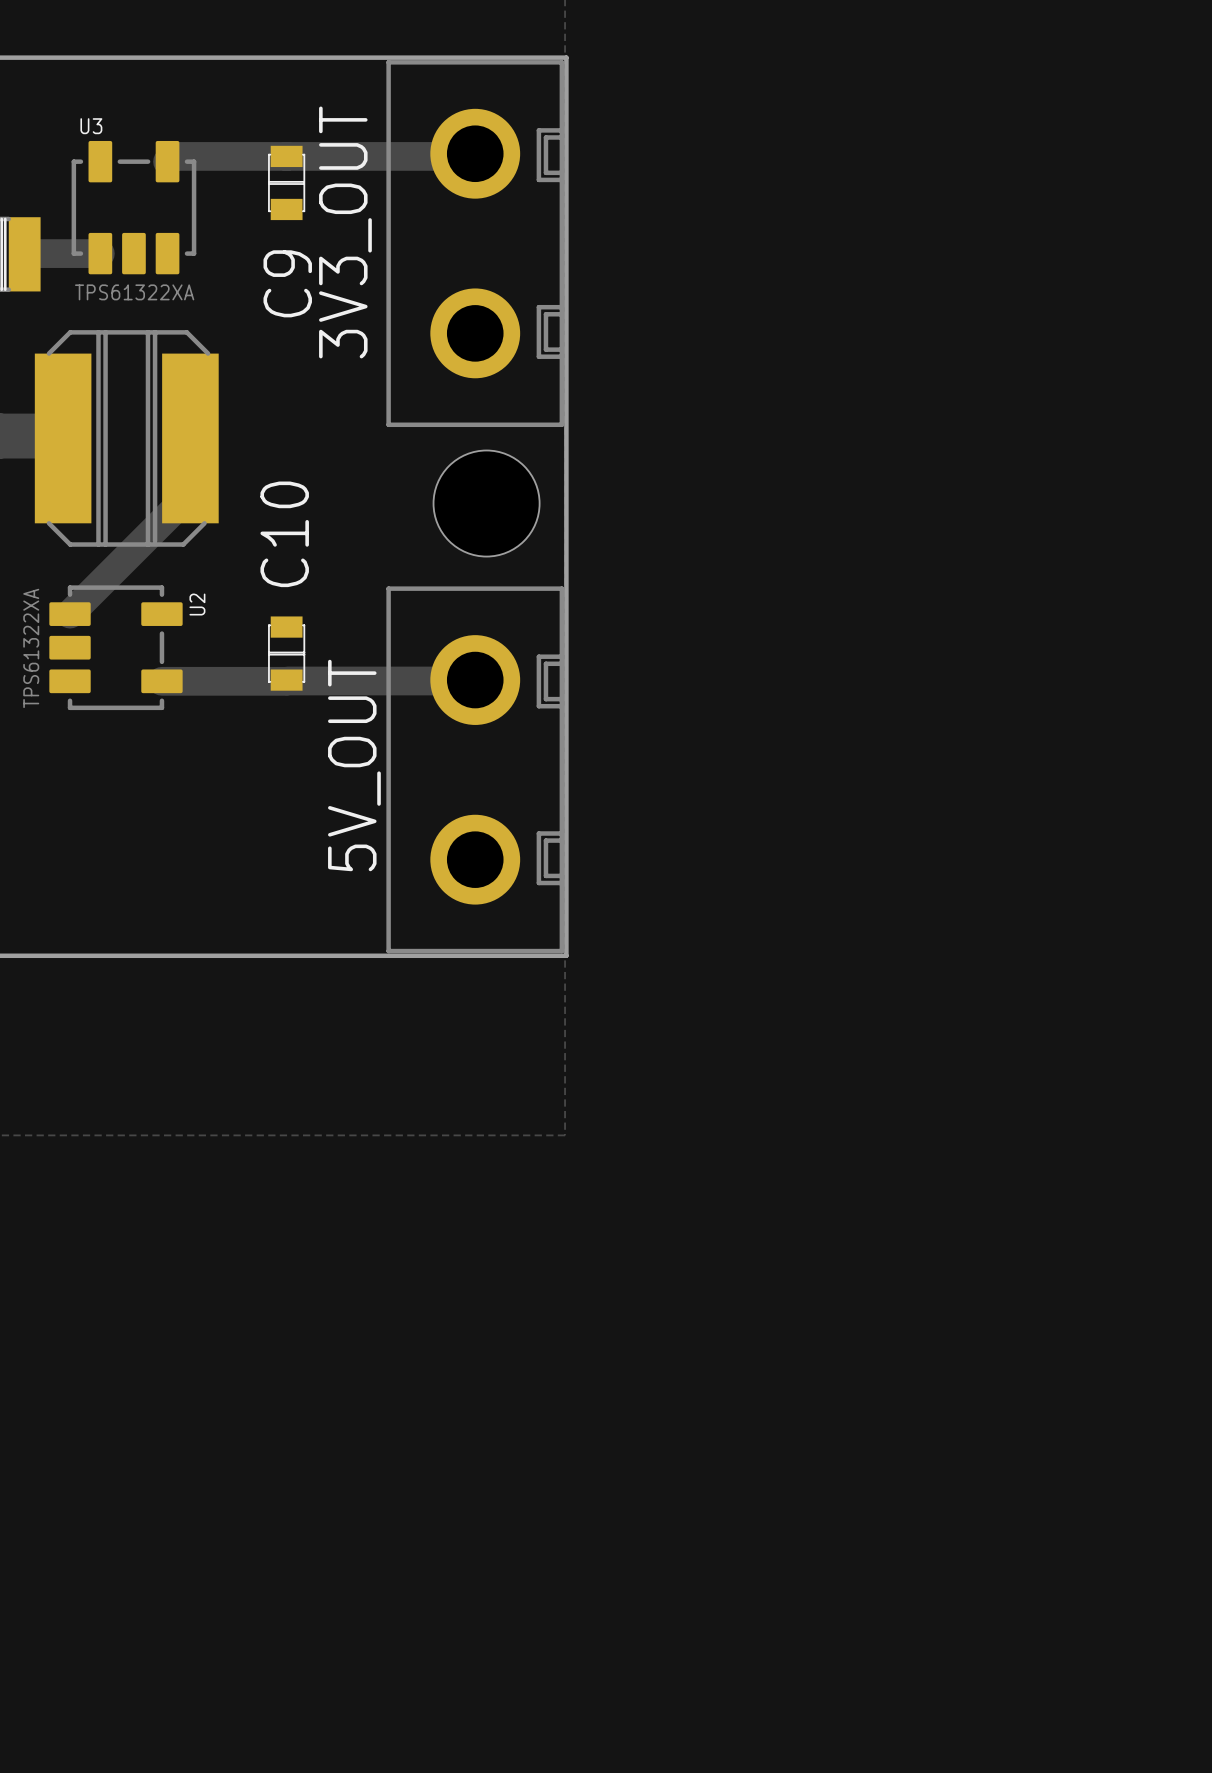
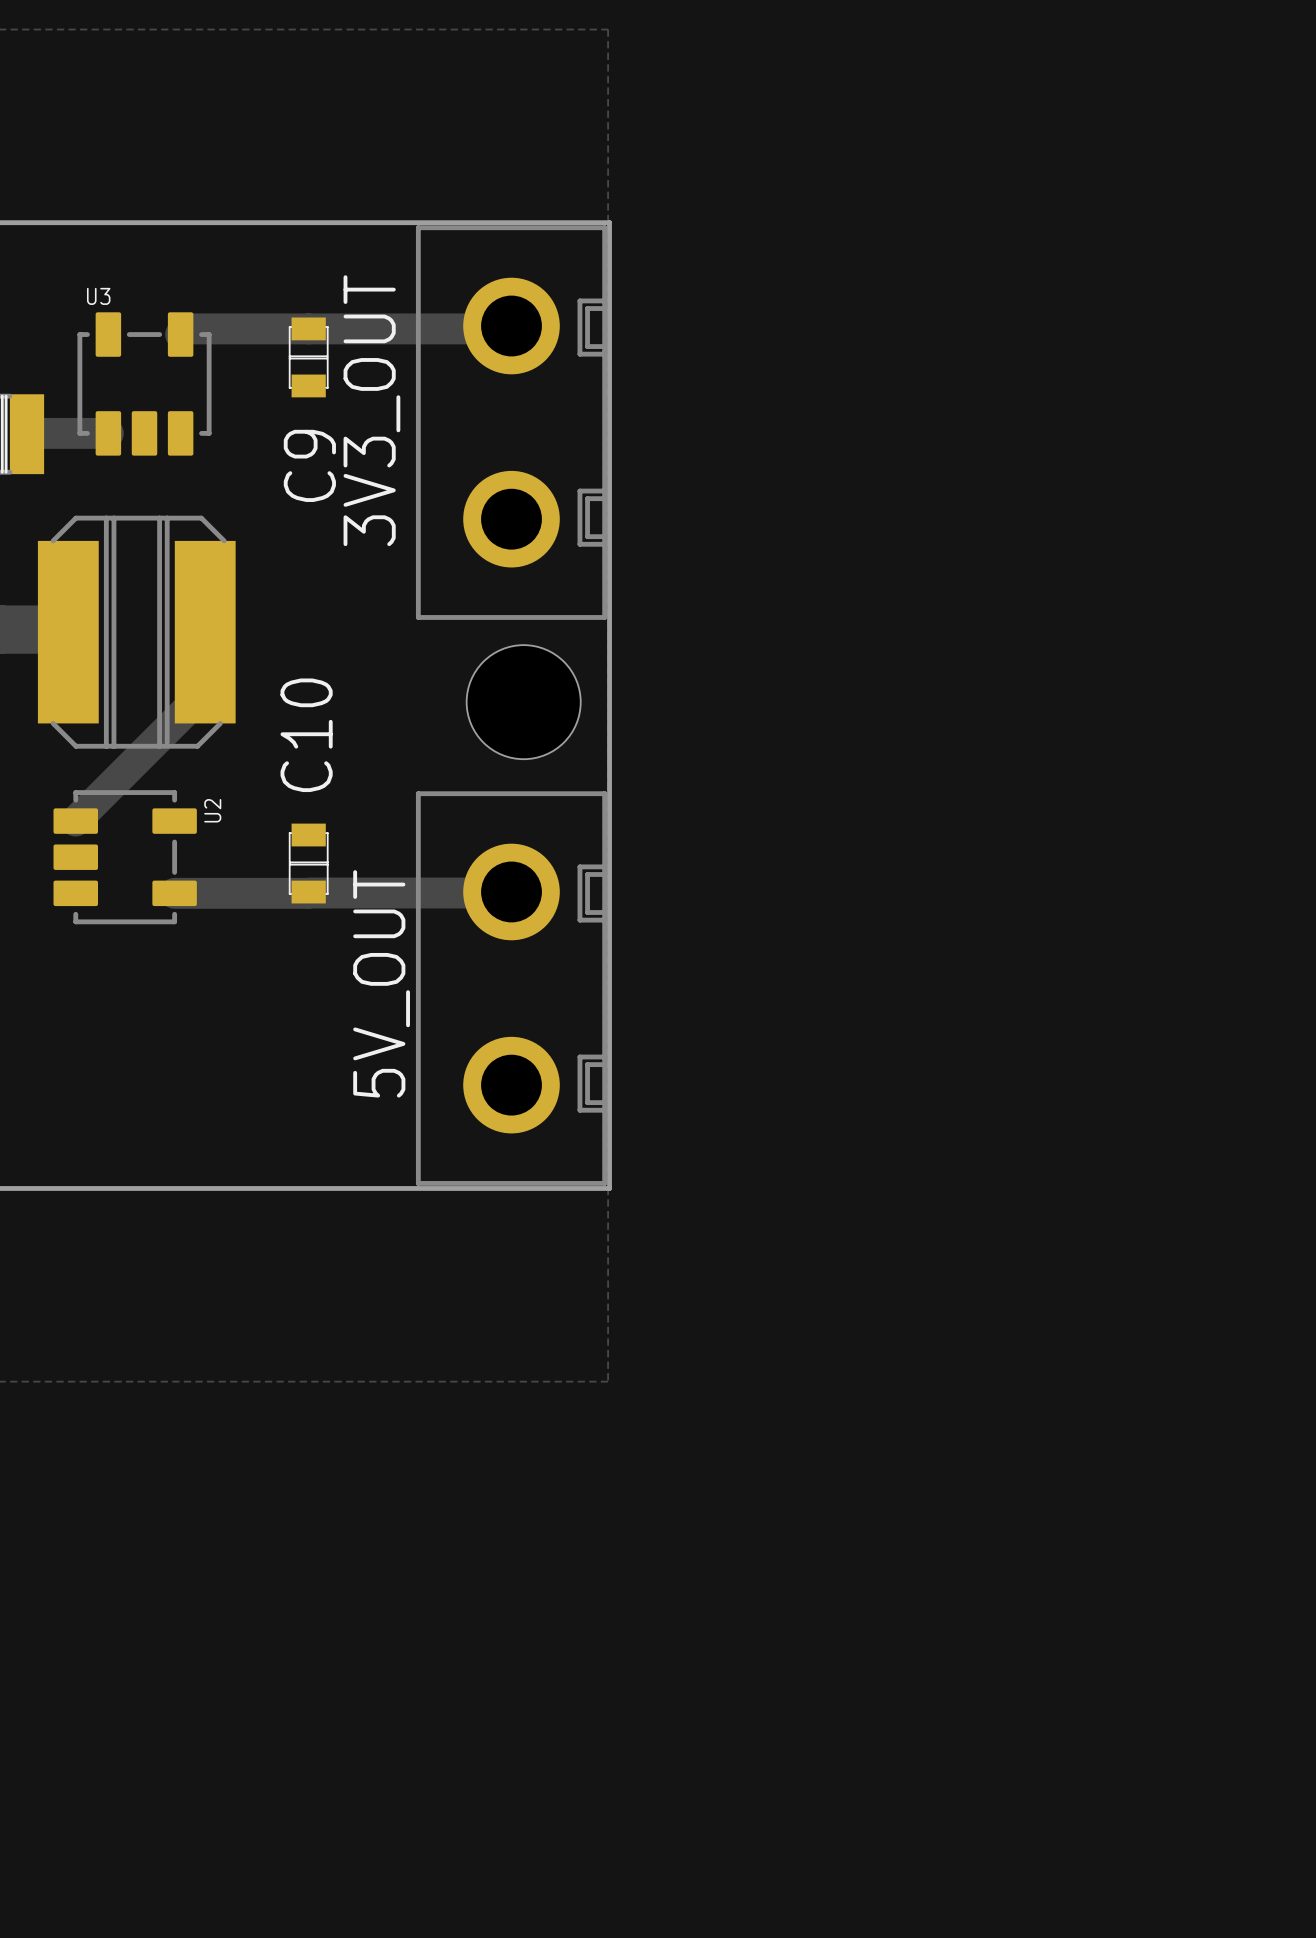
U3 value: TPS61322XA (134, 292) -> none
U2 value: TPS61322XA (31, 648) -> none

